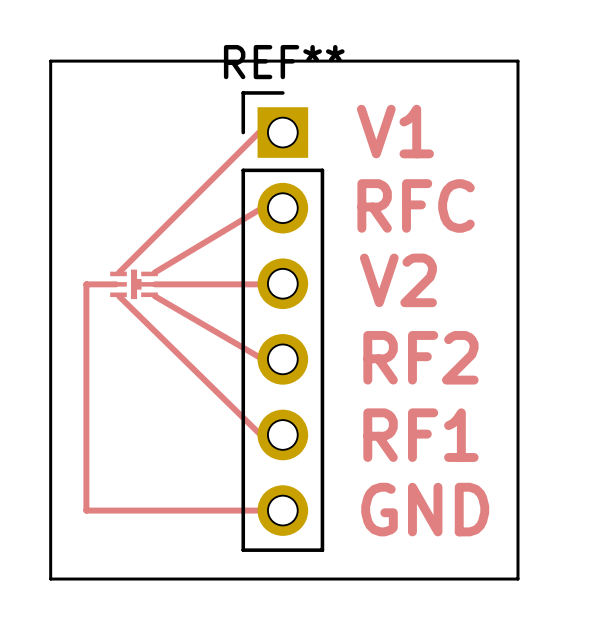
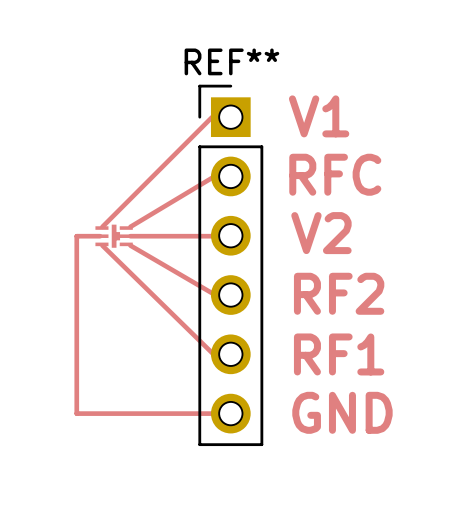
board edge: (50, 61) (517, 61) (517, 579) (50, 579) (50, 61) -> none

